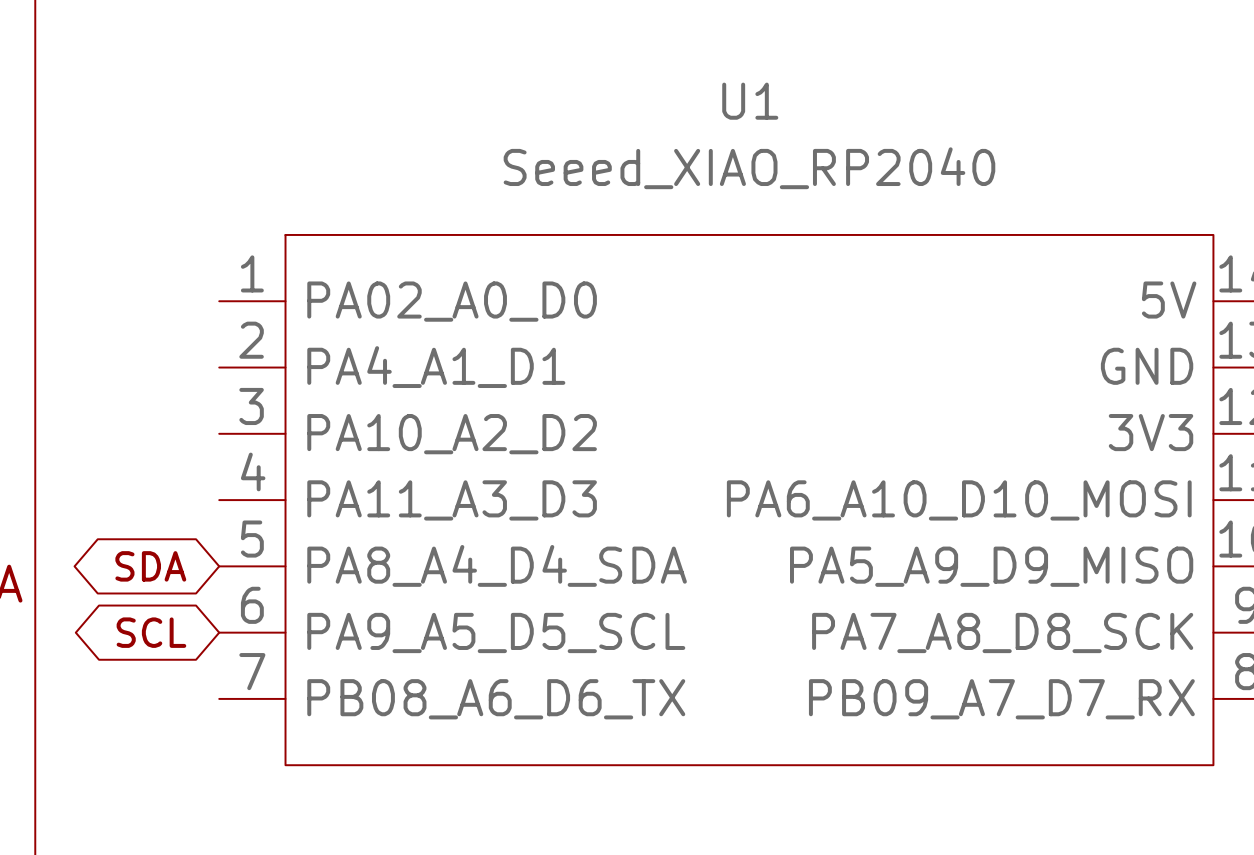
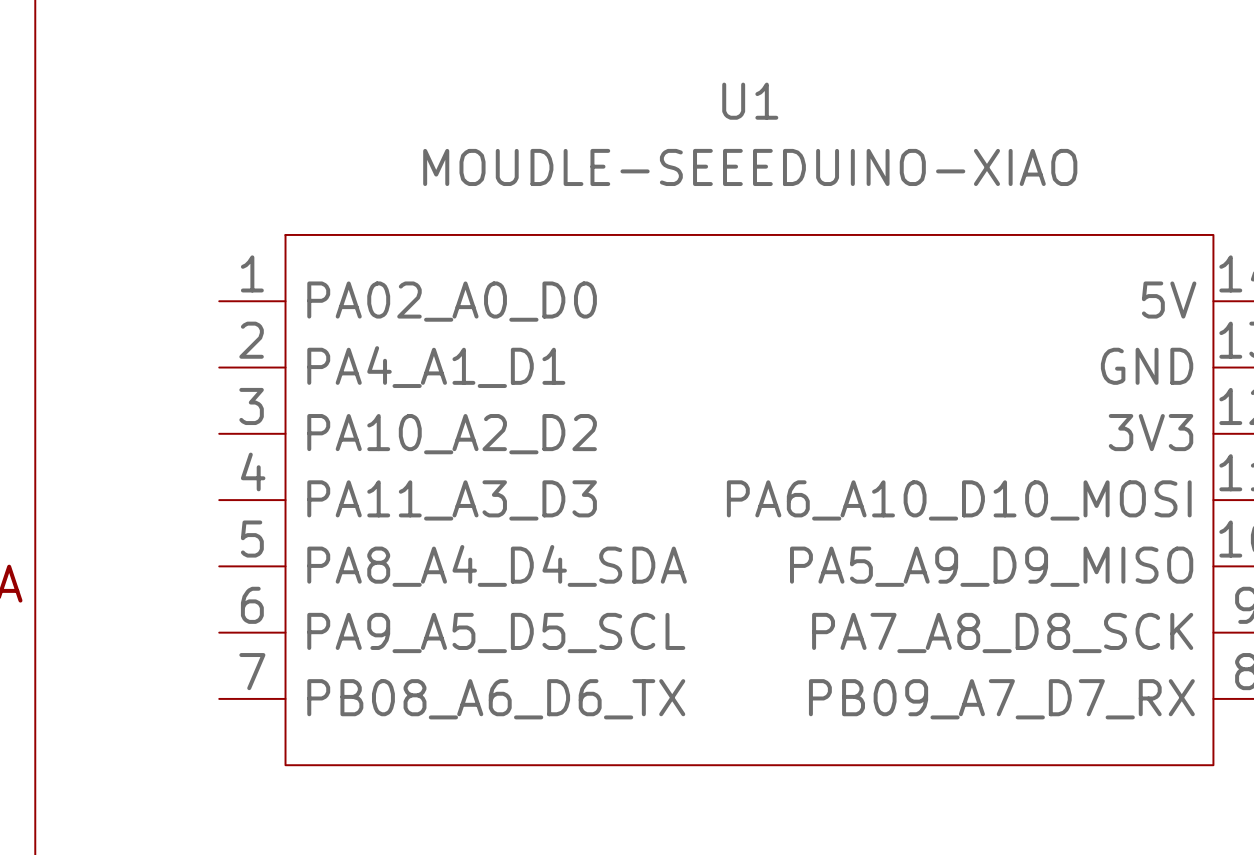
U1 value: Seeed_XIAO_RP2040 (749, 168) -> MOUDLE-SEEEDUINO-XIAO (750, 167)
global label: SDA (150, 566) -> none
global label: SCL (151, 632) -> none

